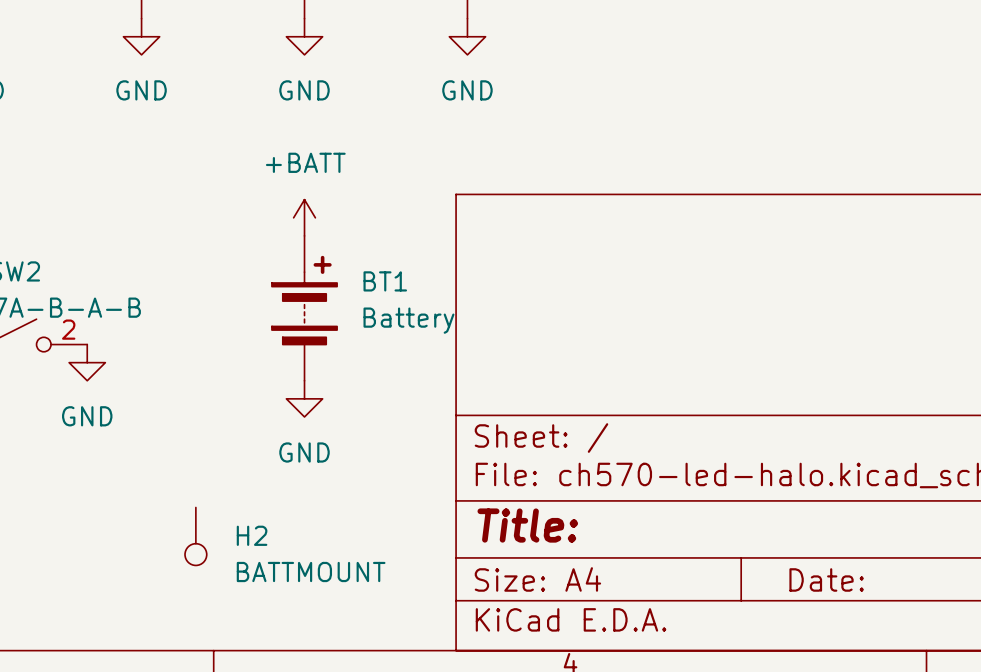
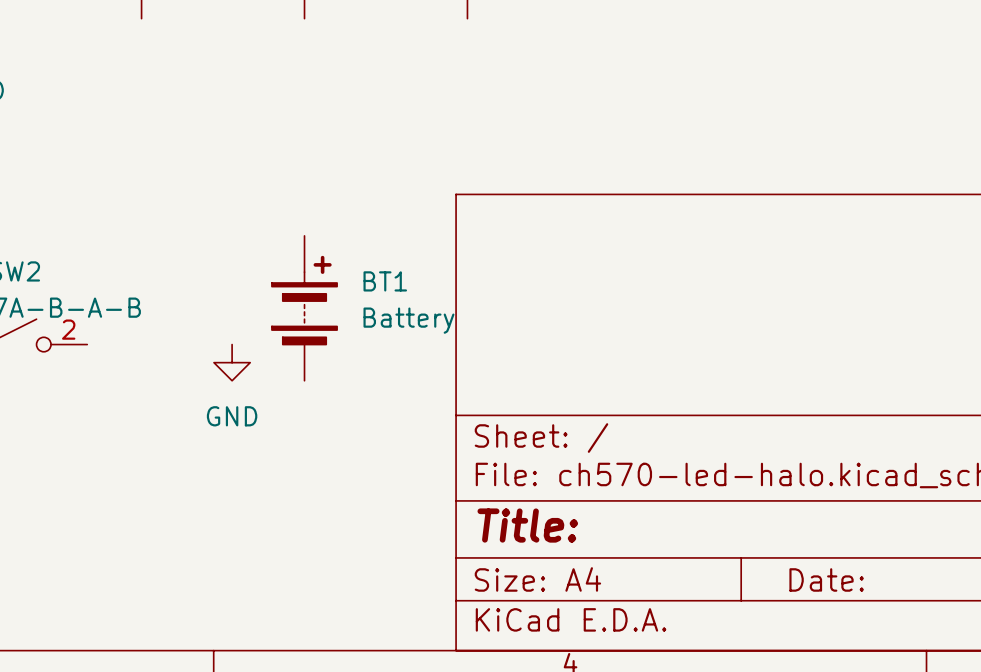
power symbol: GND (141, 36) -> none
power symbol: GND (304, 36) -> none
power symbol: GND (467, 36) -> none
power symbol: +BATT (304, 217) -> none
power symbol: GND (87, 362) -> none
power symbol: none -> GND (232, 362)
power symbol: GND (304, 398) -> none
H2: BATTMOUNT (195, 536) -> none

